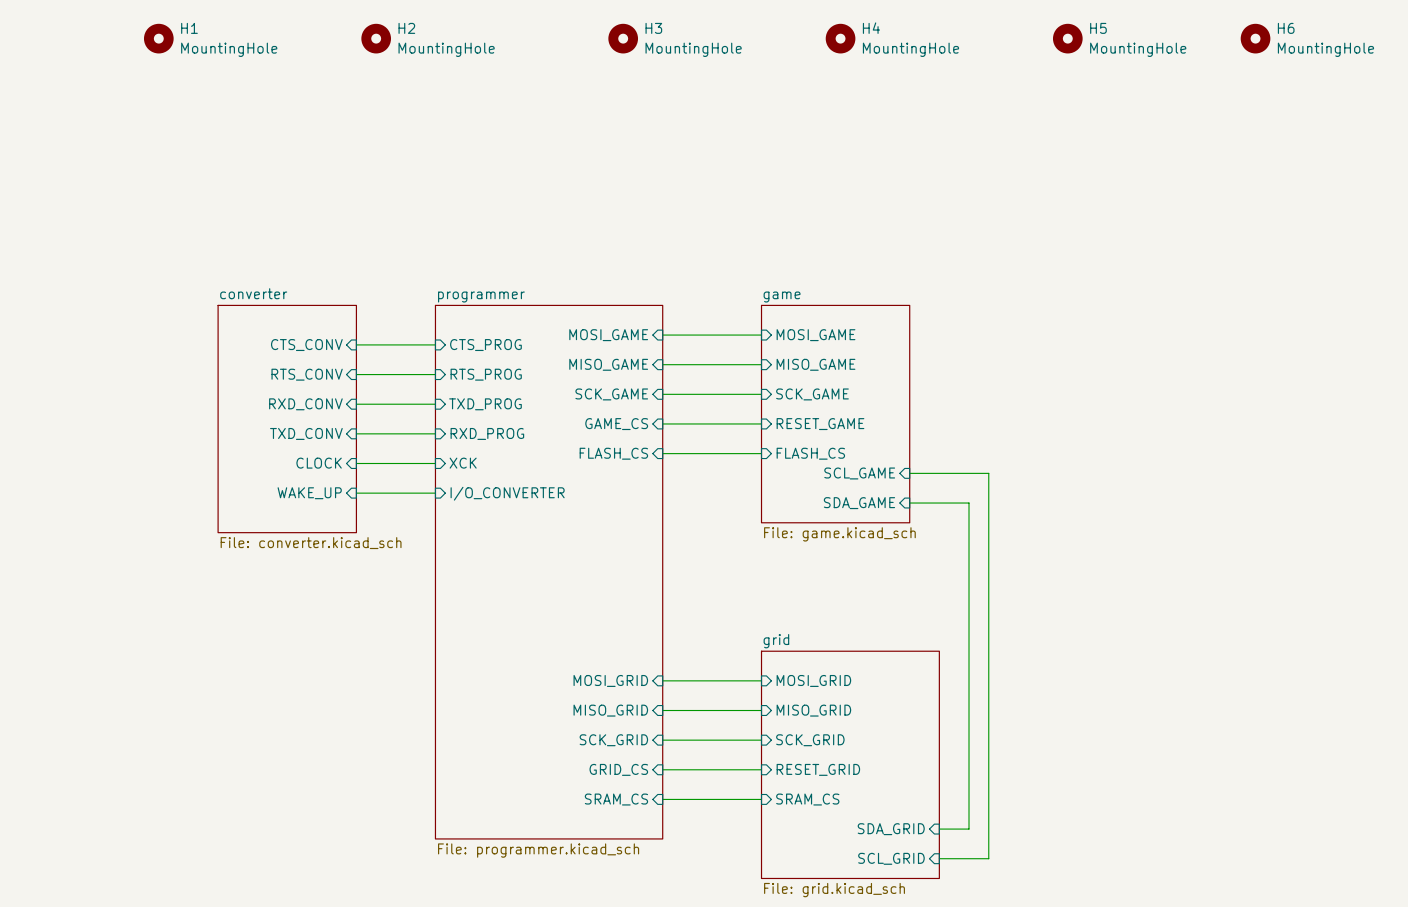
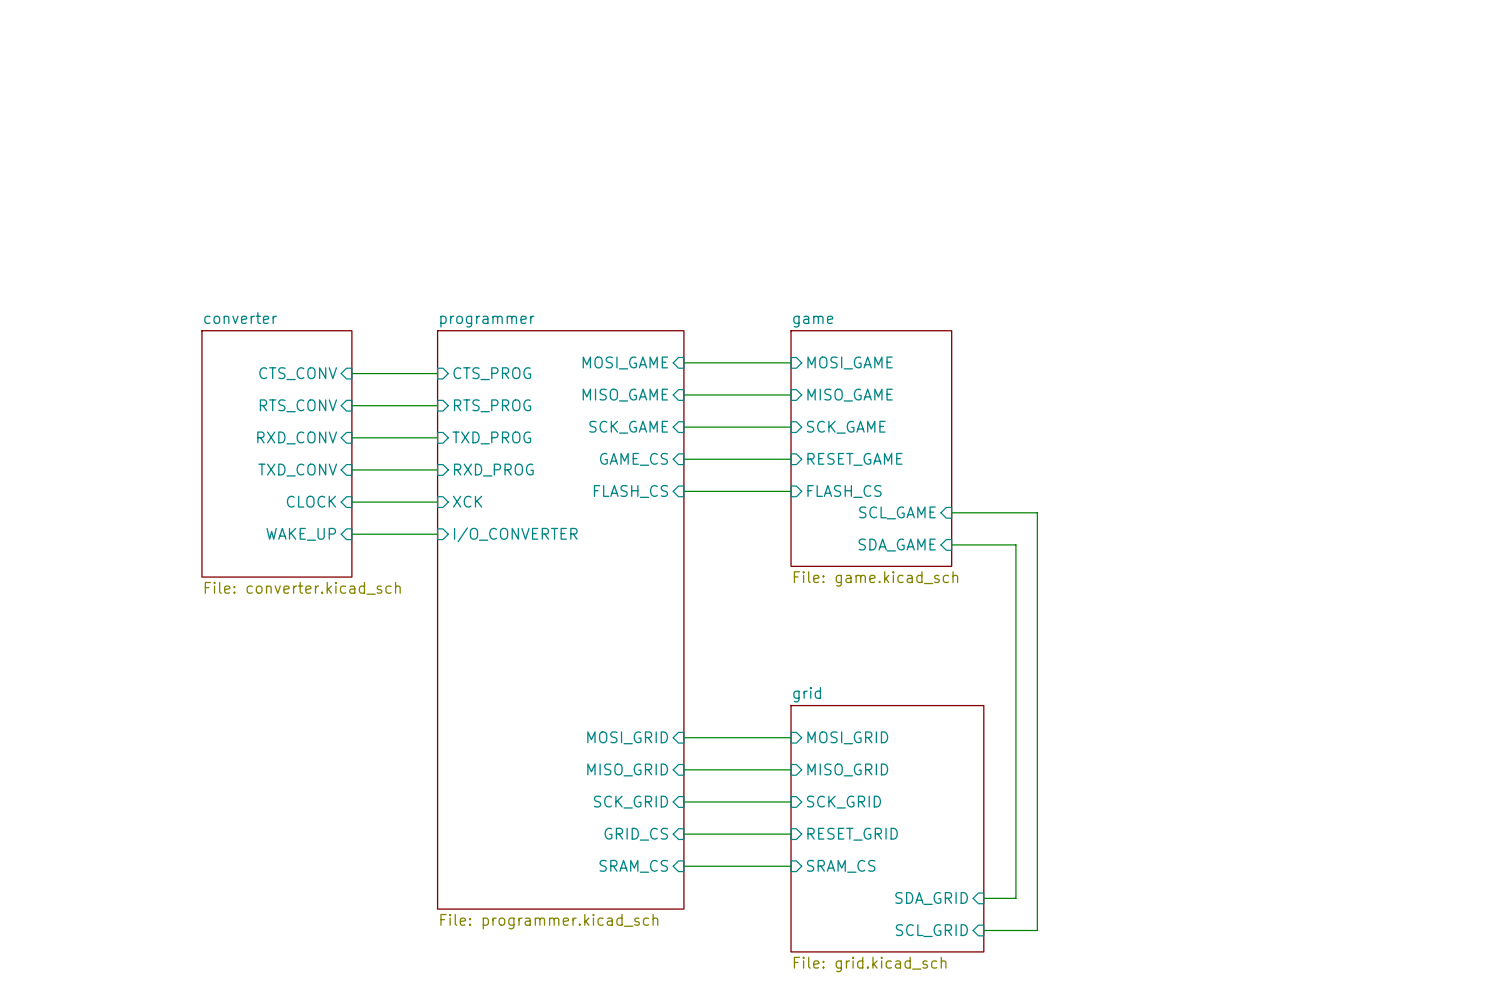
H1: MountingHole (158, 38) -> none
H2: MountingHole (376, 38) -> none
H3: MountingHole (623, 38) -> none
H4: MountingHole (840, 38) -> none
H5: MountingHole (1067, 38) -> none
H6: MountingHole (1255, 38) -> none

